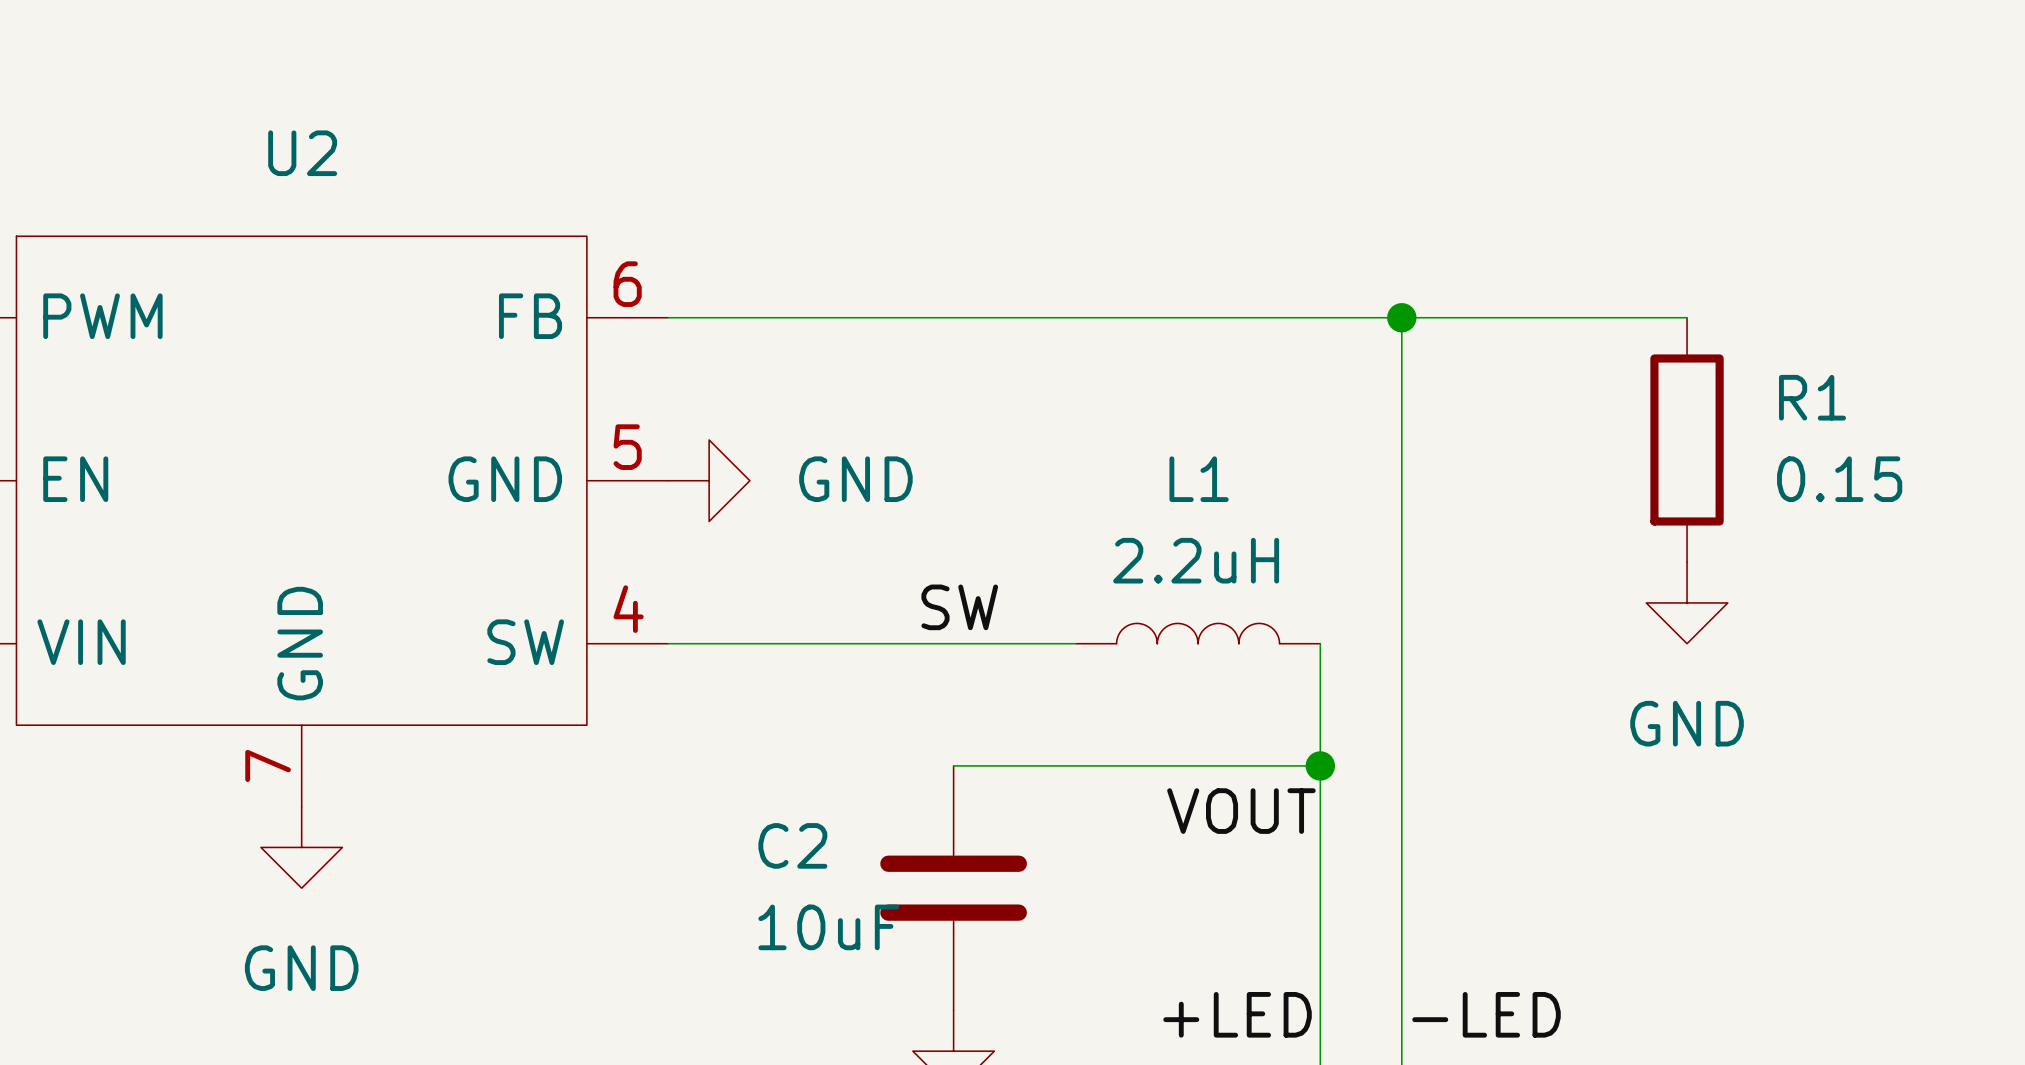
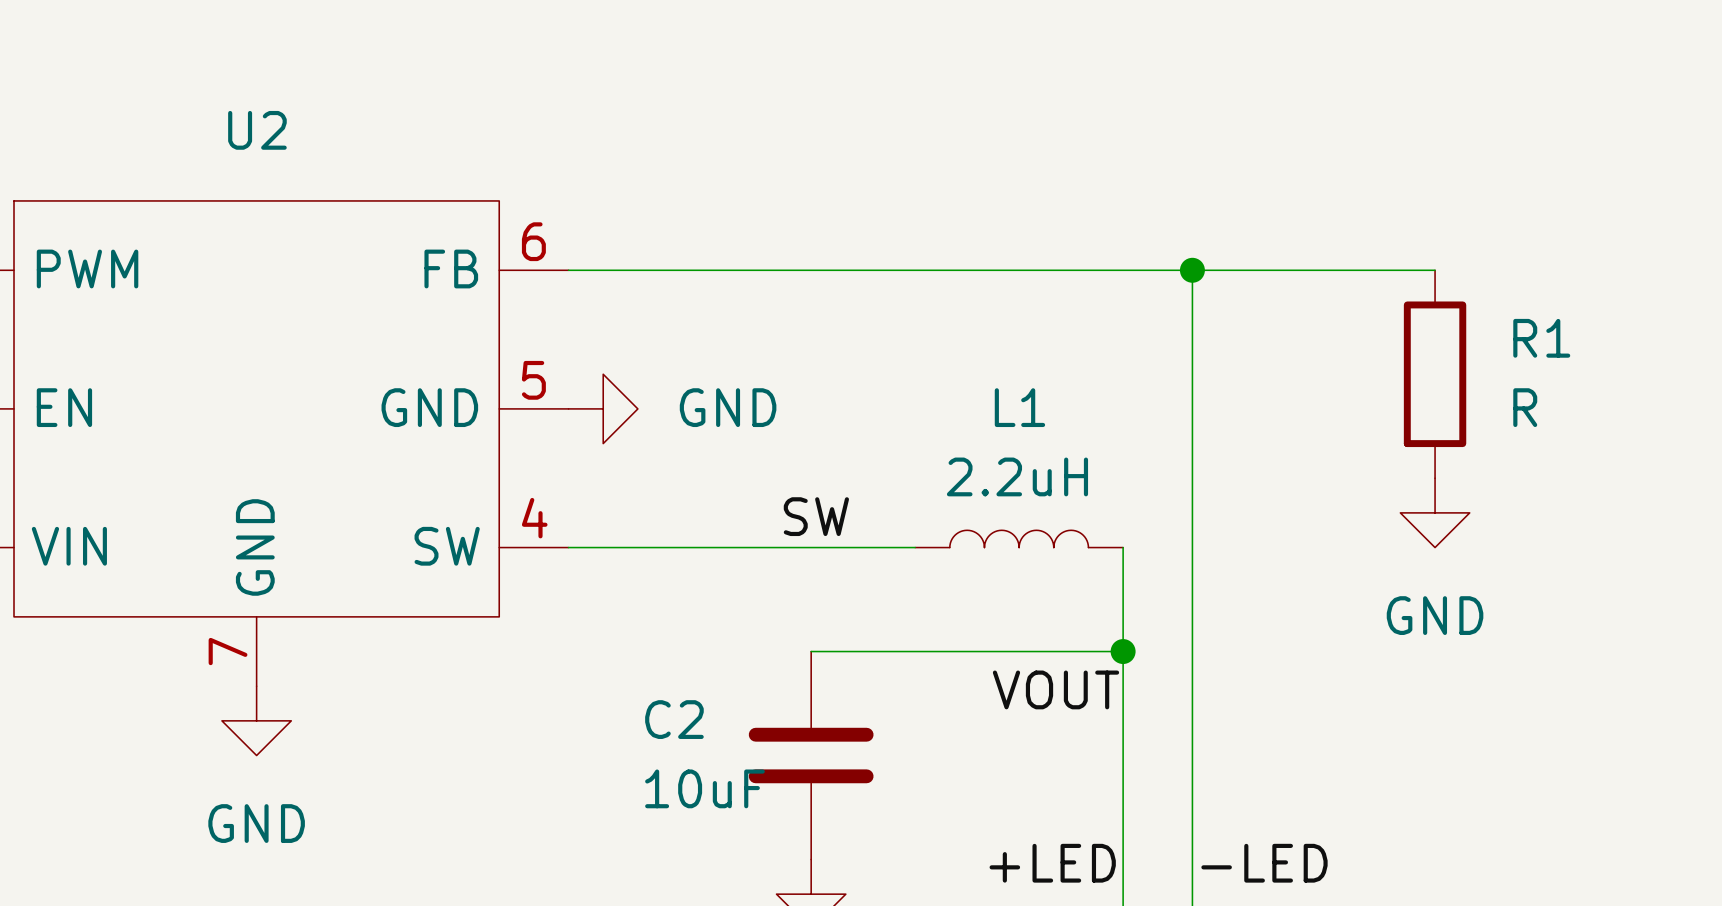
R1 value: 0.15 (1839, 479) -> R (1525, 407)

